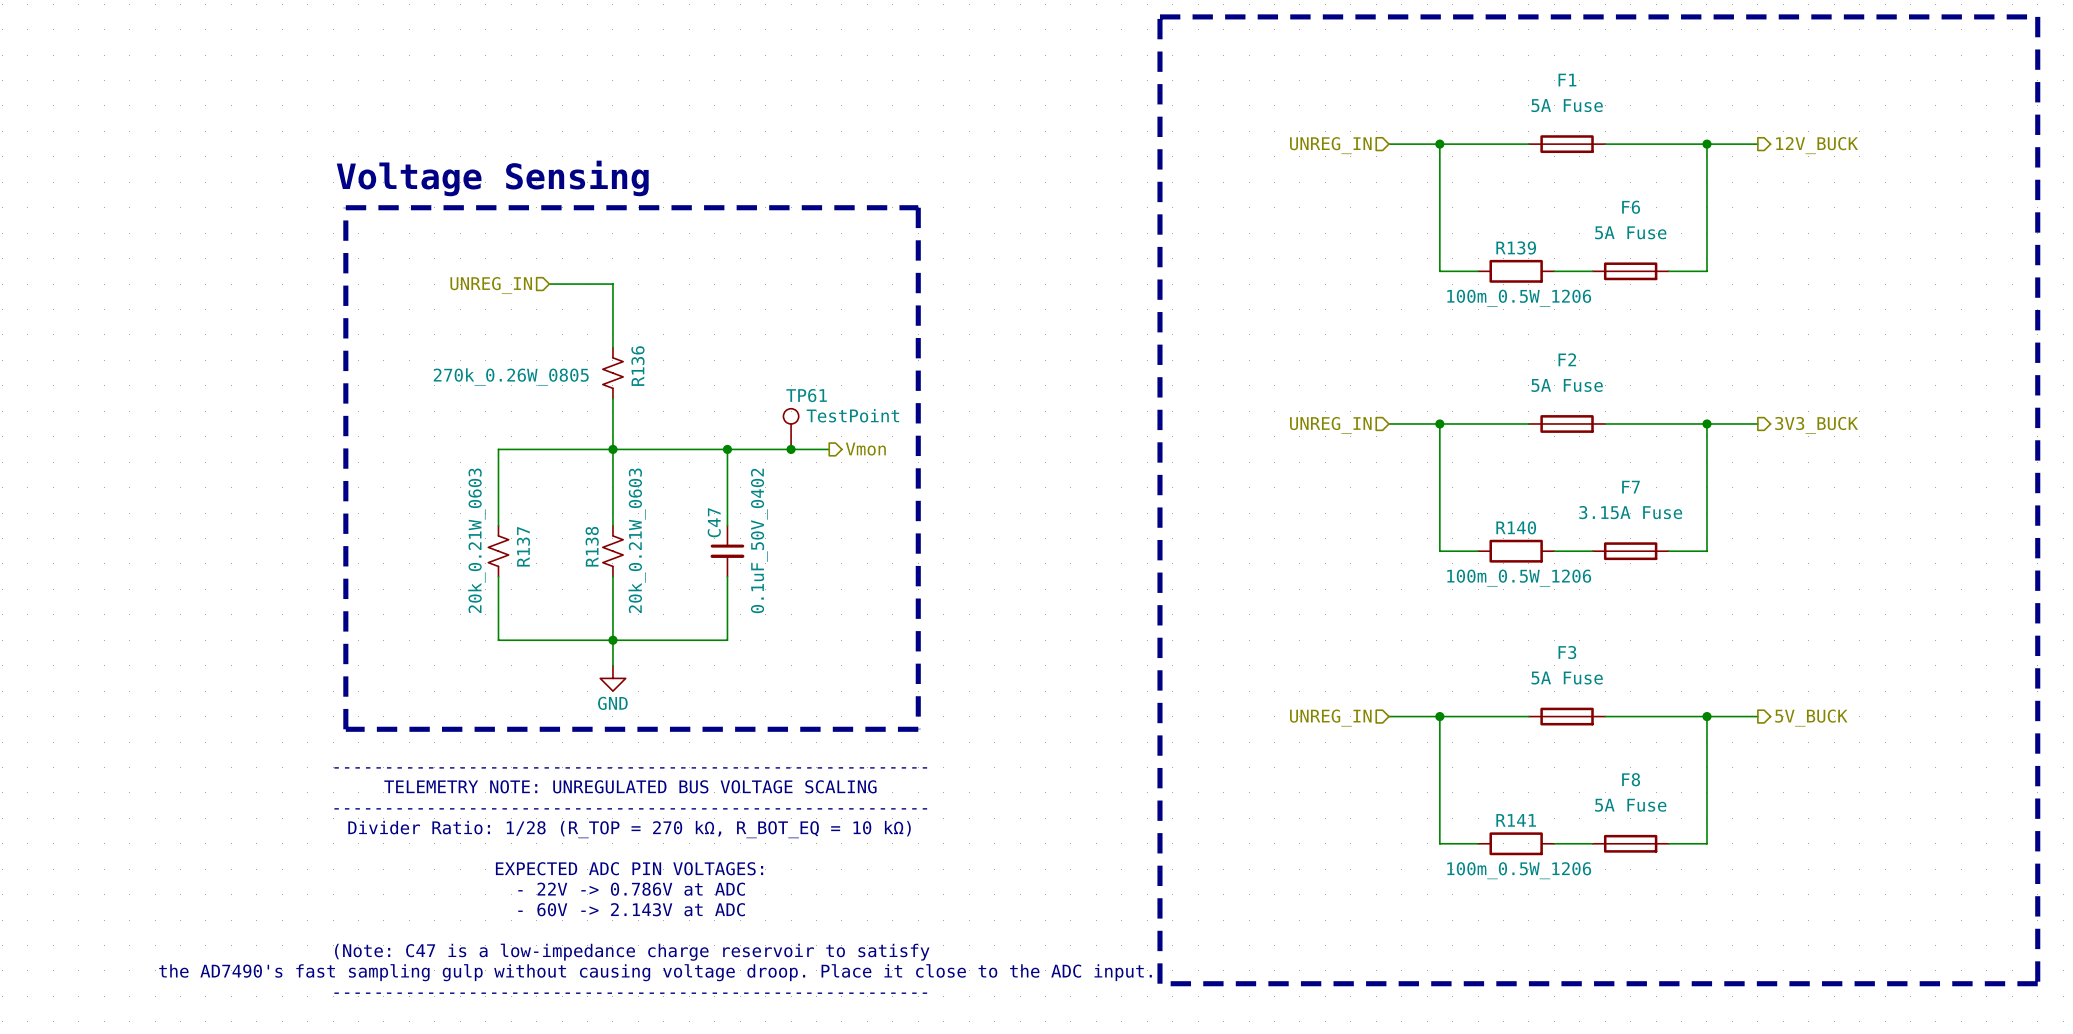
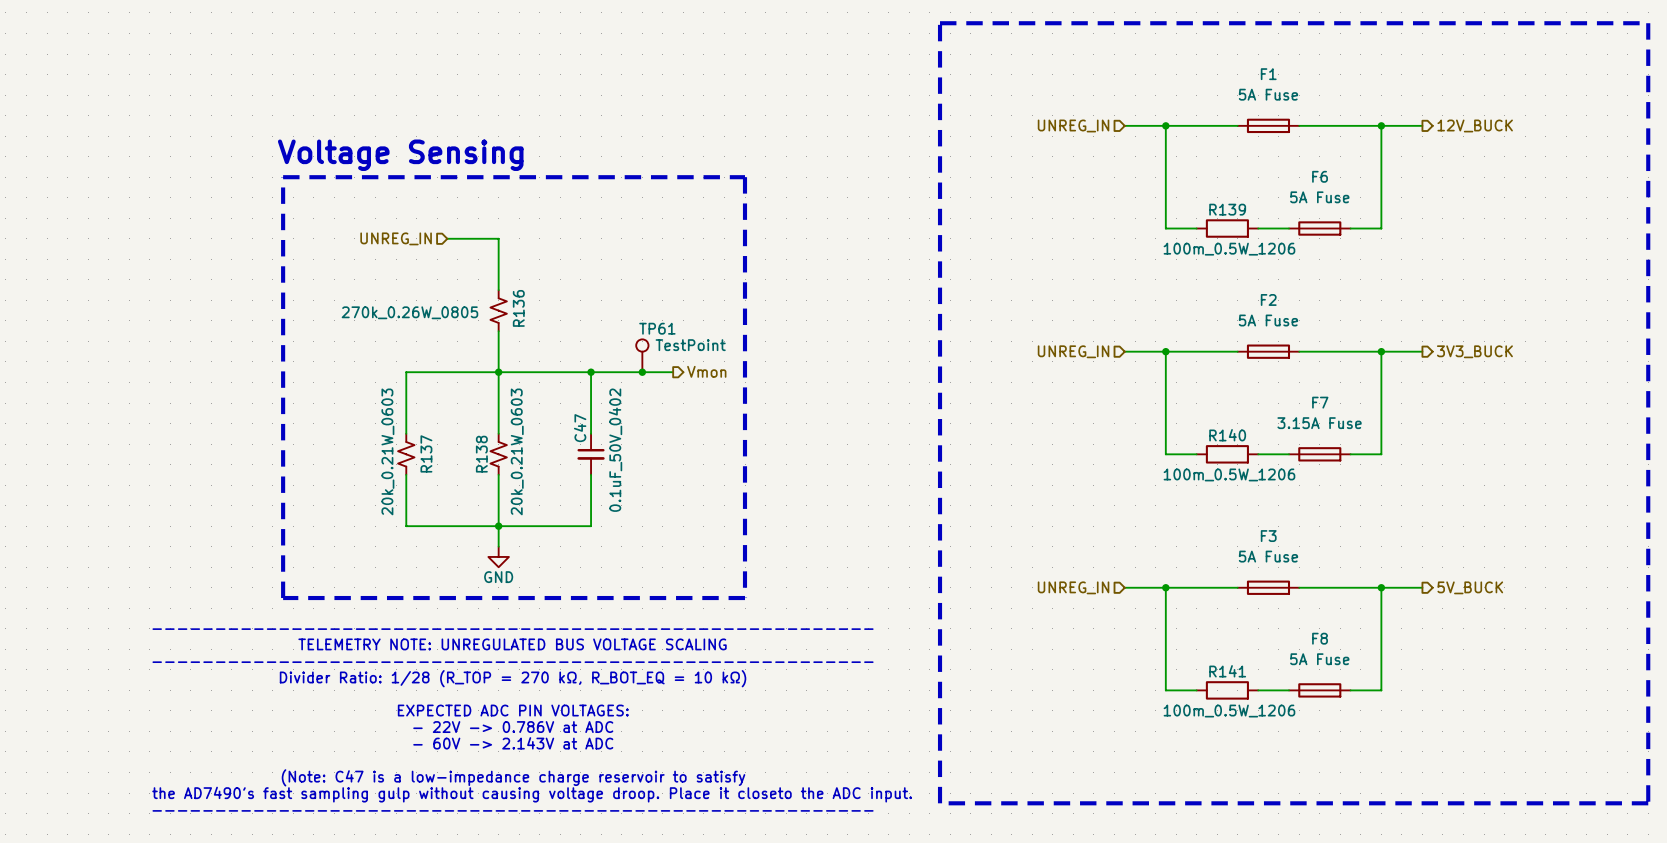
text: the AD7490's fast sampling gulp without causing voltage droop. Place it close to the ADC input. (655, 972) -> the AD7490's fast sampling gulp without causing voltage droop. Place it closeto the ADC input. (532, 794)

